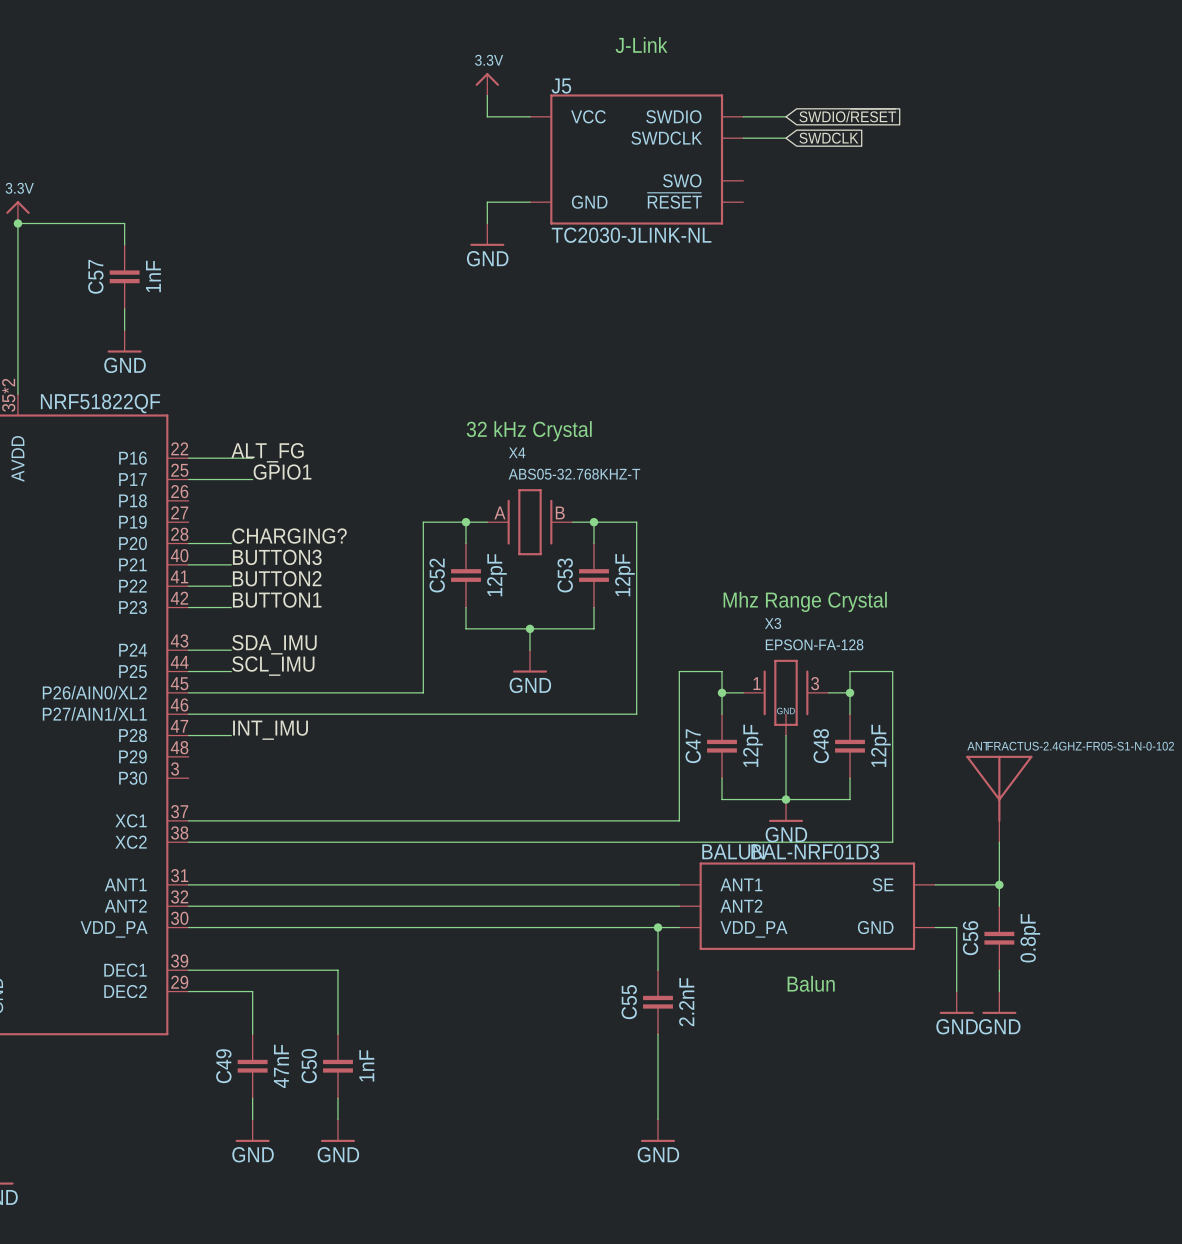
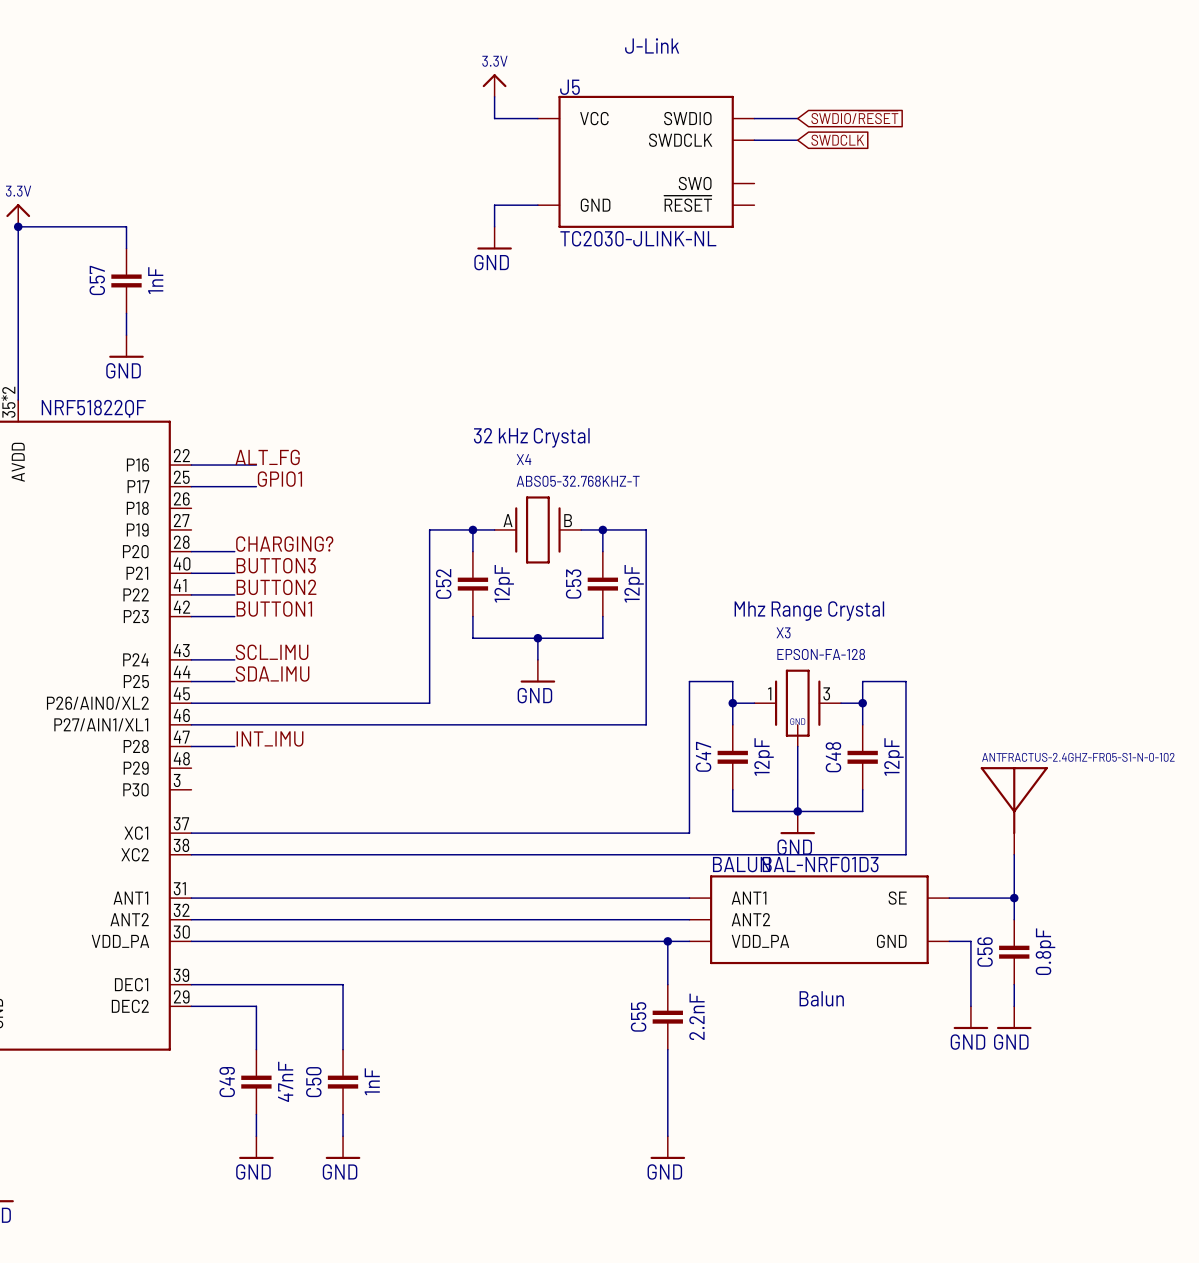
label: SDA_IMU (274, 644) -> SCL_IMU (272, 652)
label: SCL_IMU (273, 666) -> SDA_IMU (272, 673)

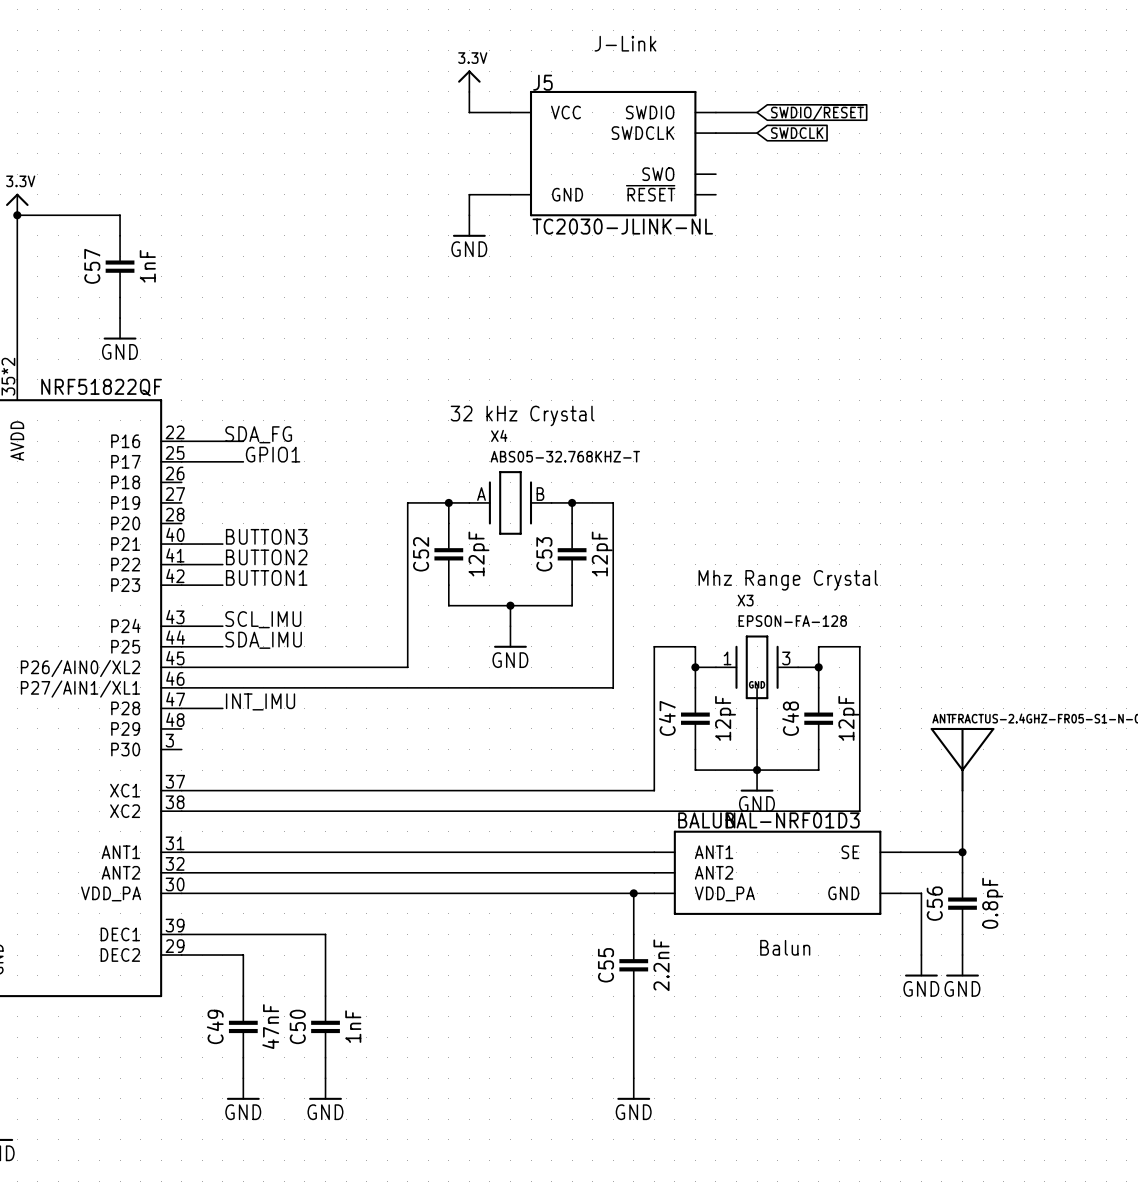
label: ALT_FG (267, 457) -> SDA_FG (258, 434)
label: CHARGING? (284, 544) -> none
wire: (191, 551) (234, 551) -> none

